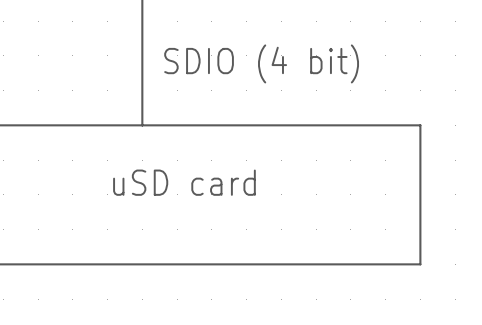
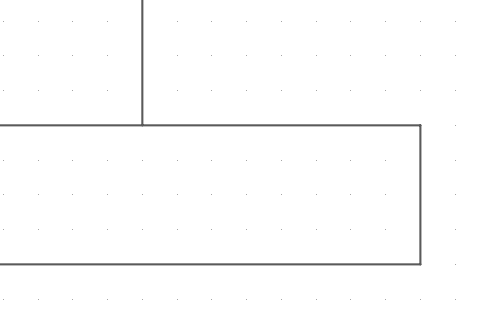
text: SDIO (4 bit) (261, 63) -> none
text: uSD card (184, 182) -> none

